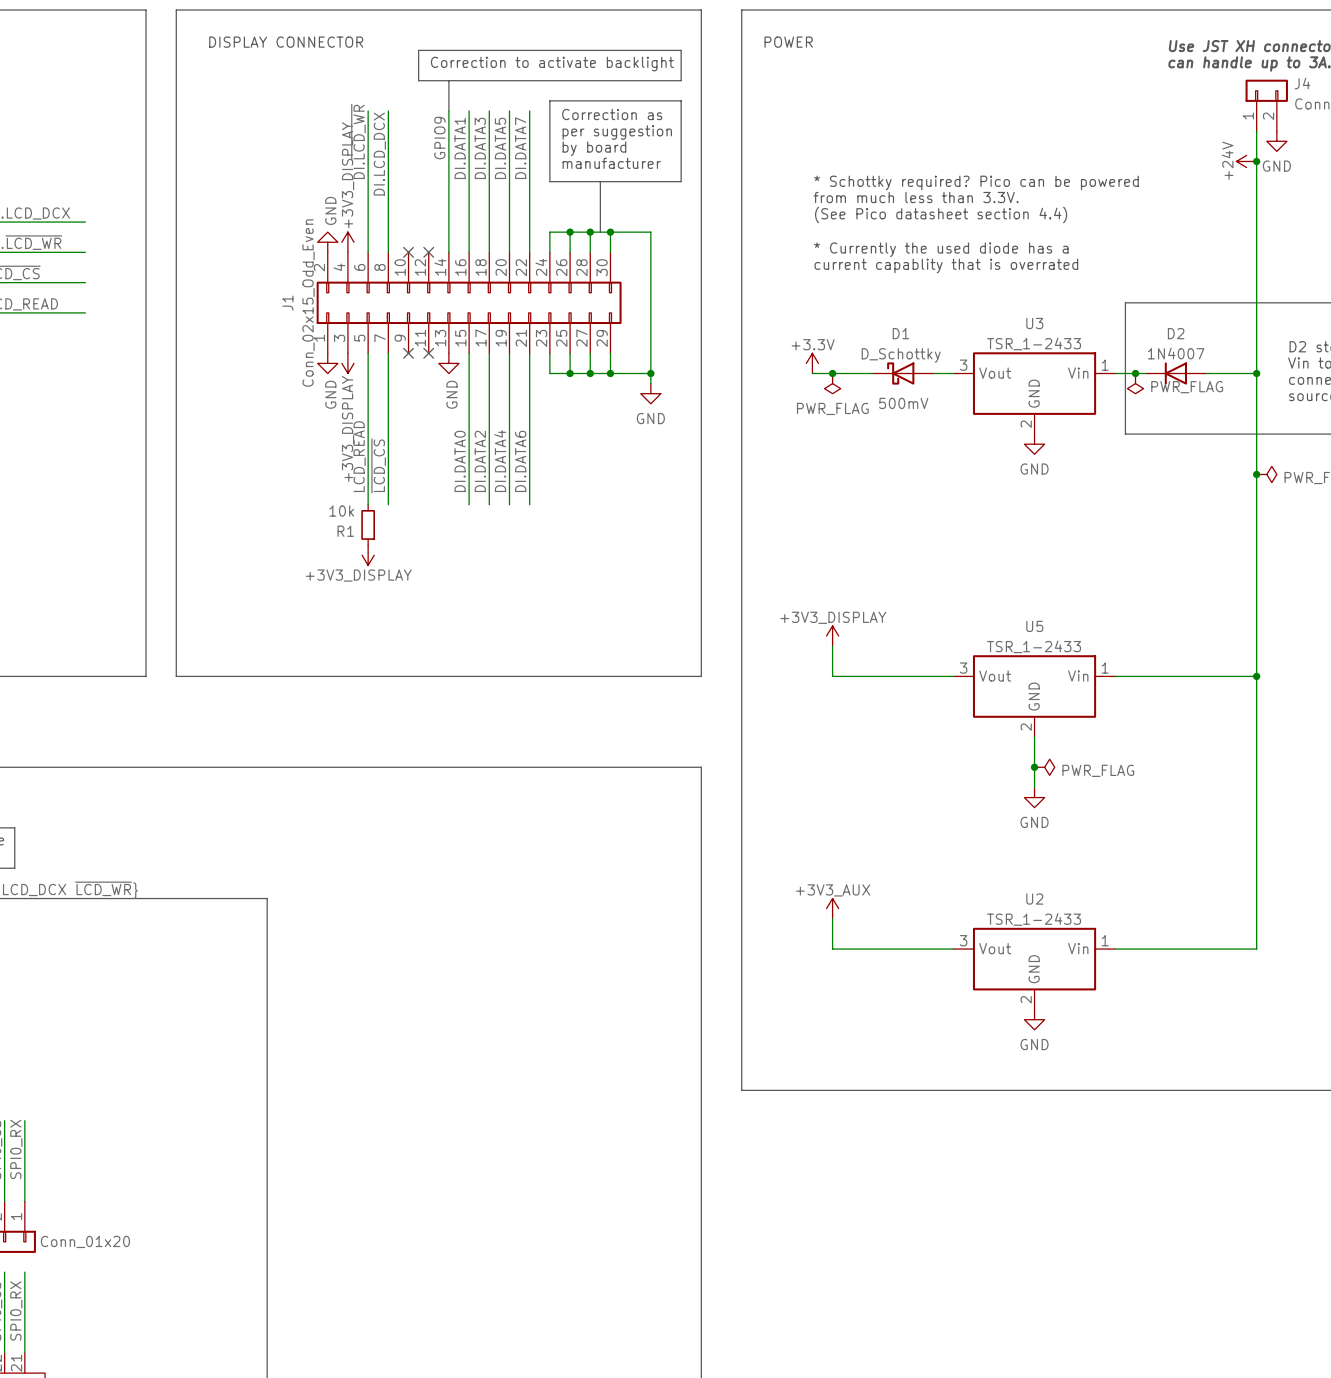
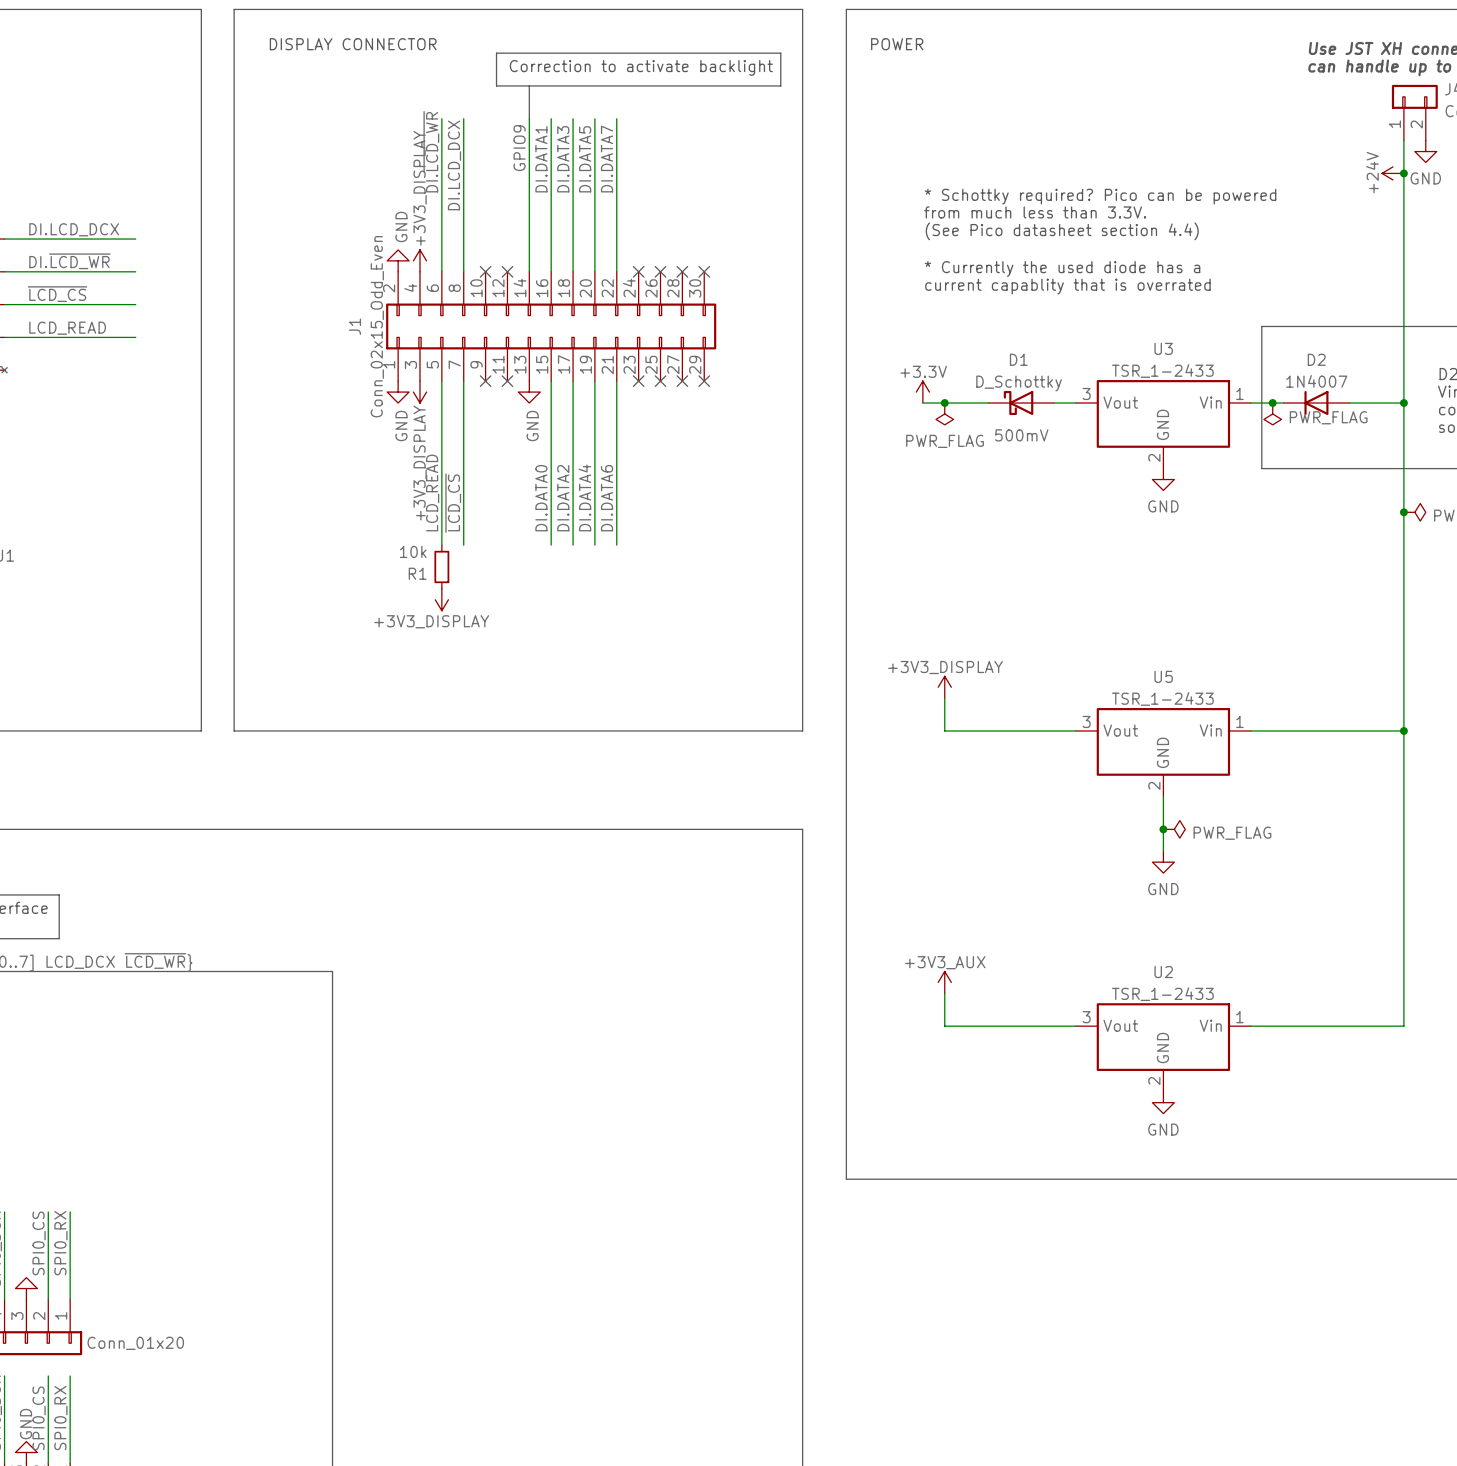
line: (549, 100) (681, 100) (681, 181) (549, 181) (549, 100) -> none
text: Correction as (612, 114) -> none
text: per suggestion (617, 132) -> none
text: by board (594, 148) -> none
text: manufacturer (611, 163) -> none
line: (600, 181) (600, 232) -> none
wire: (570, 232) (570, 252) -> none
junction: (570, 232) -> none
wire: (590, 232) (590, 252) -> none
junction: (590, 232) -> none
wire: (610, 232) (610, 252) -> none
junction: (610, 232) -> none
wire: (549, 252) (549, 232) (650, 232) (650, 383) -> none
no-connect mark: none -> (638, 271)
no-connect mark: none -> (660, 271)
no-connect mark: none -> (682, 271)
no-connect mark: none -> (704, 271)
wire: (549, 353) (549, 373) (650, 373) -> none
no-connect mark: none -> (638, 381)
wire: (570, 353) (570, 373) -> none
no-connect mark: none -> (660, 381)
wire: (590, 353) (590, 373) -> none
no-connect mark: none -> (682, 381)
wire: (610, 353) (610, 373) -> none
no-connect mark: none -> (704, 381)
junction: (570, 373) -> none
junction: (590, 373) -> none
junction: (610, 373) -> none
junction: (650, 373) -> none
power symbol: GND (650, 393) -> none

